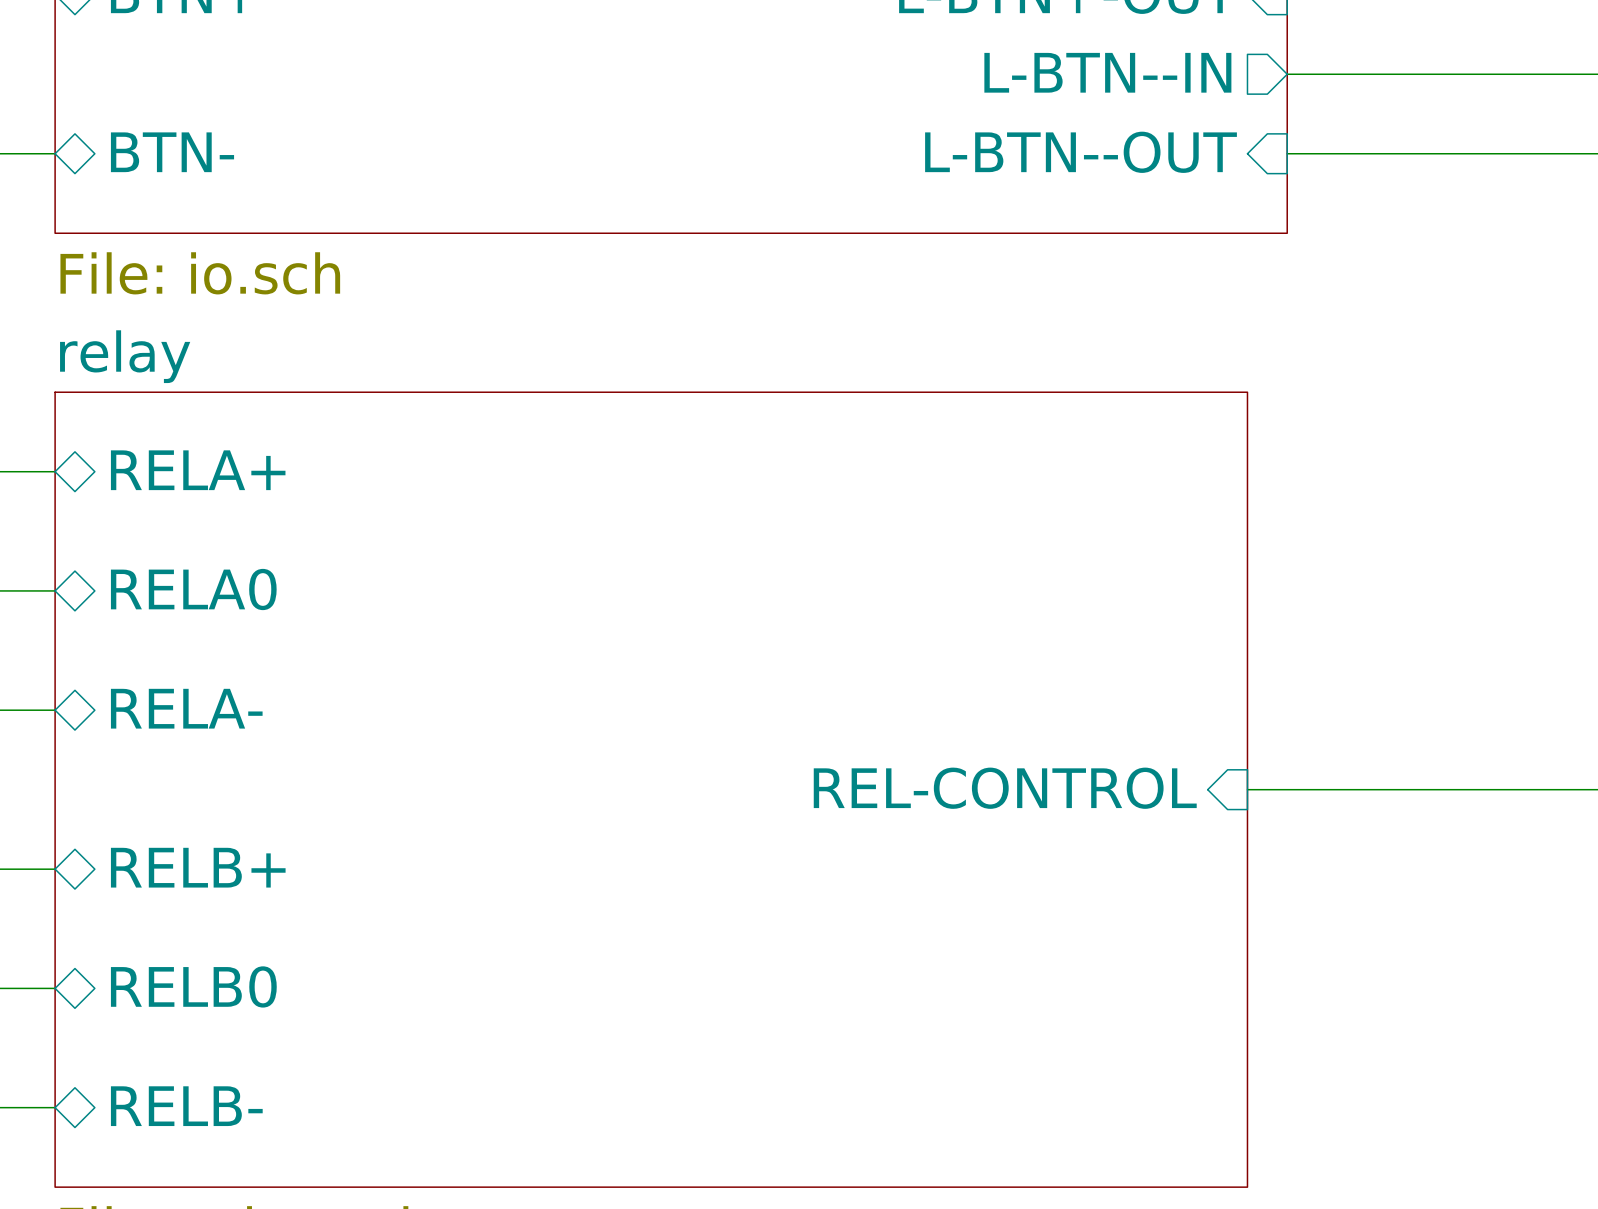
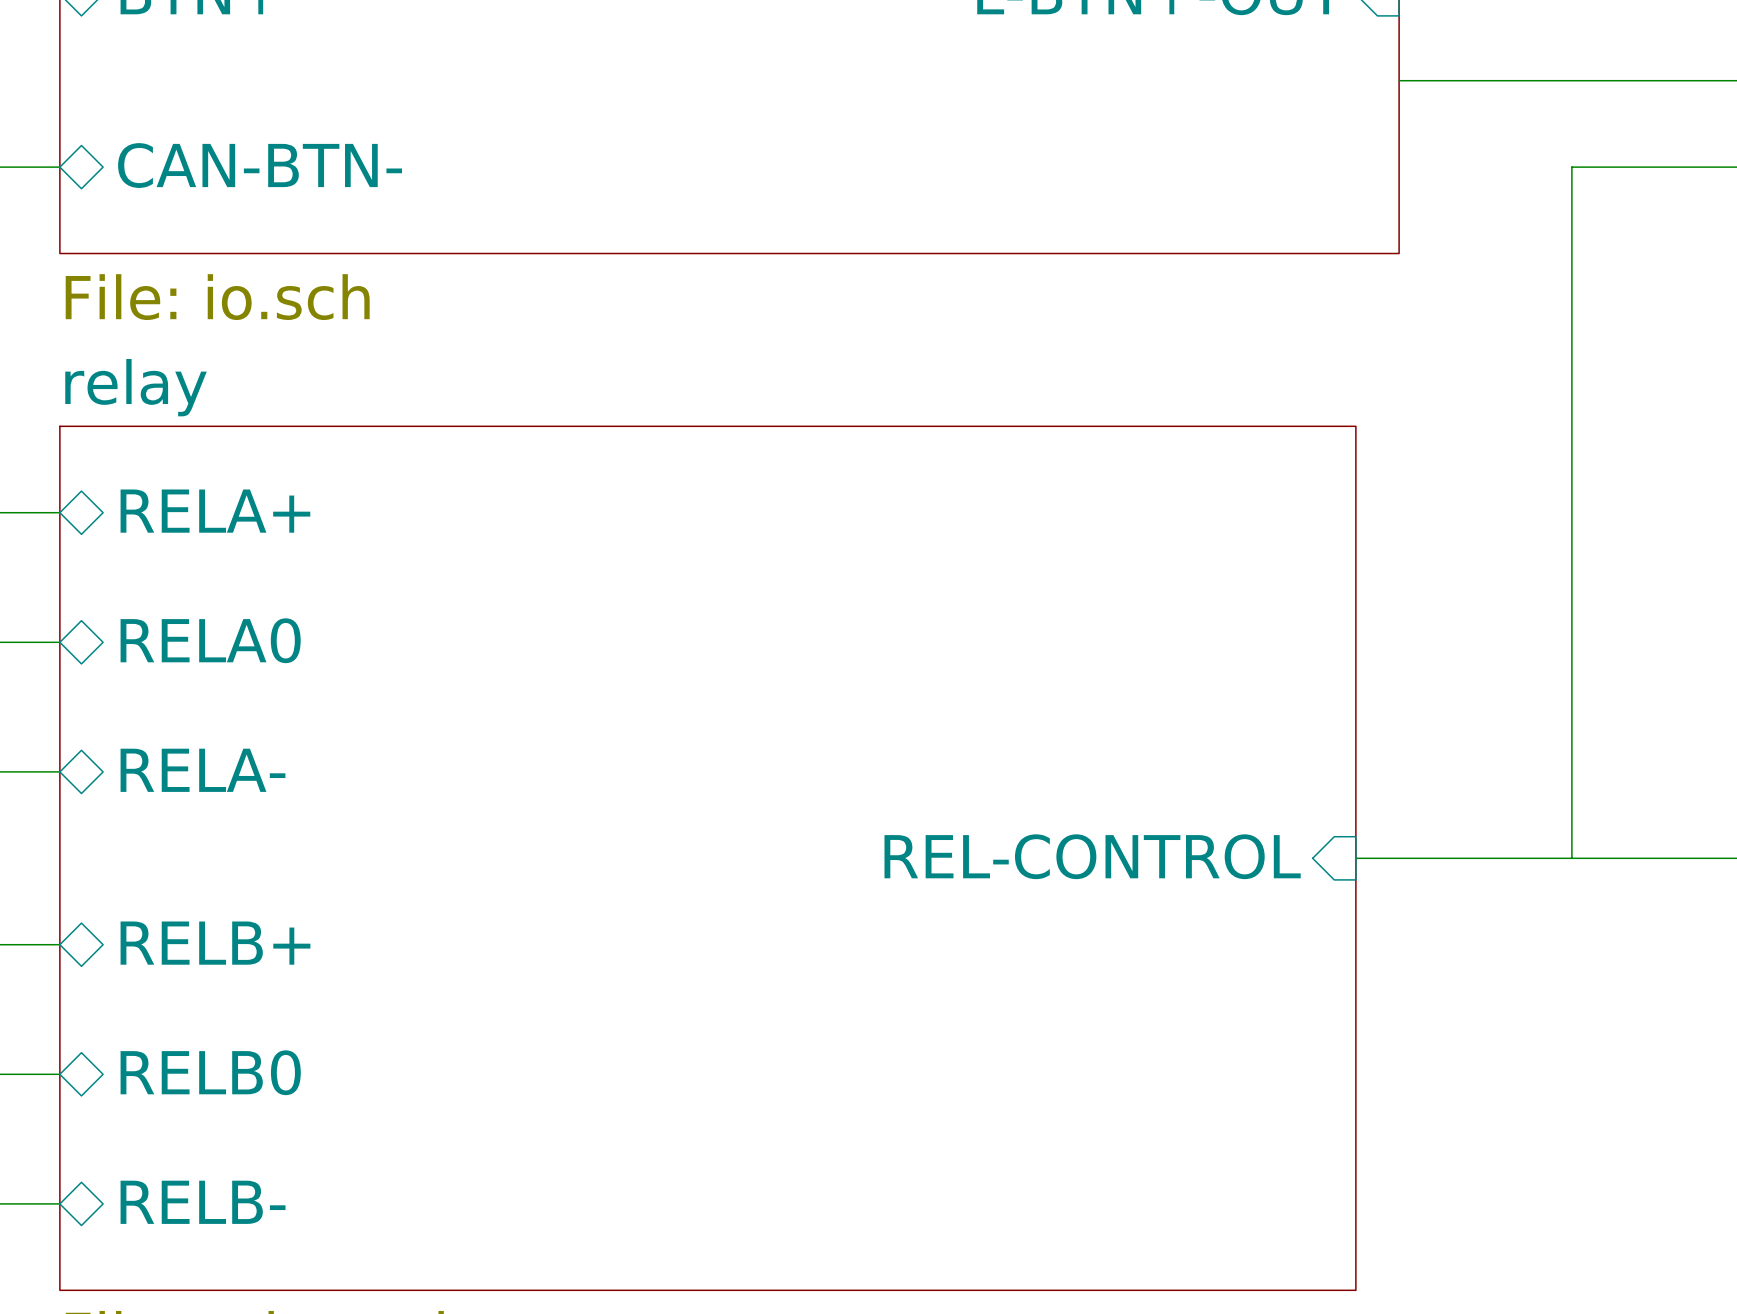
sheet pin: L-BTN--IN (1107, 72) -> none
sheet pin: BTN- (172, 152) -> CAN-BTN- (260, 165)
sheet pin: L-BTN--OUT (1081, 152) -> none
wire: (1287, 153) (1446, 153) -> (1571, 858) (1571, 167)

